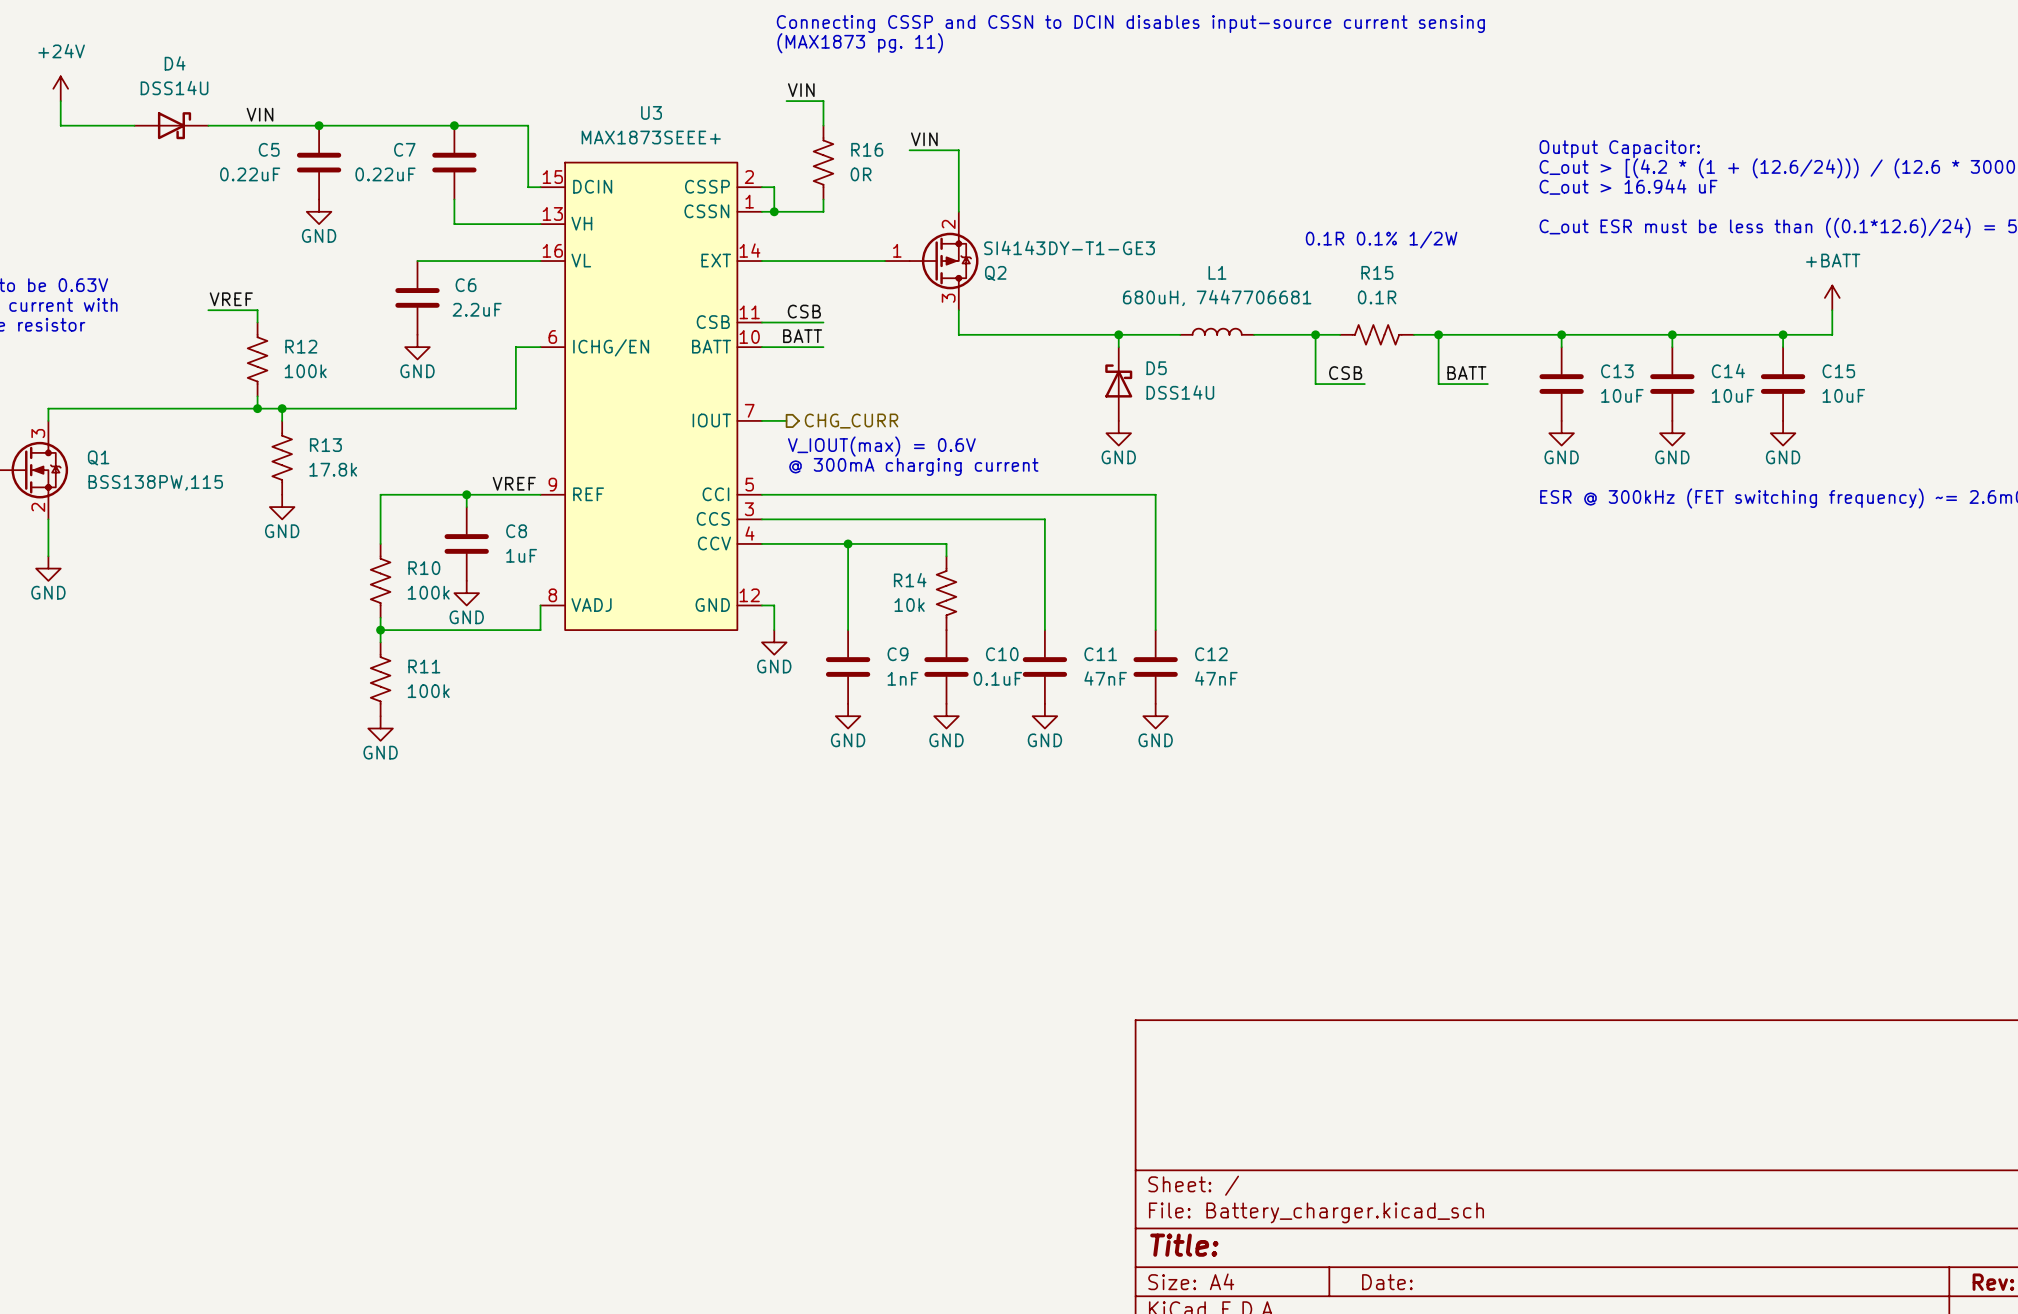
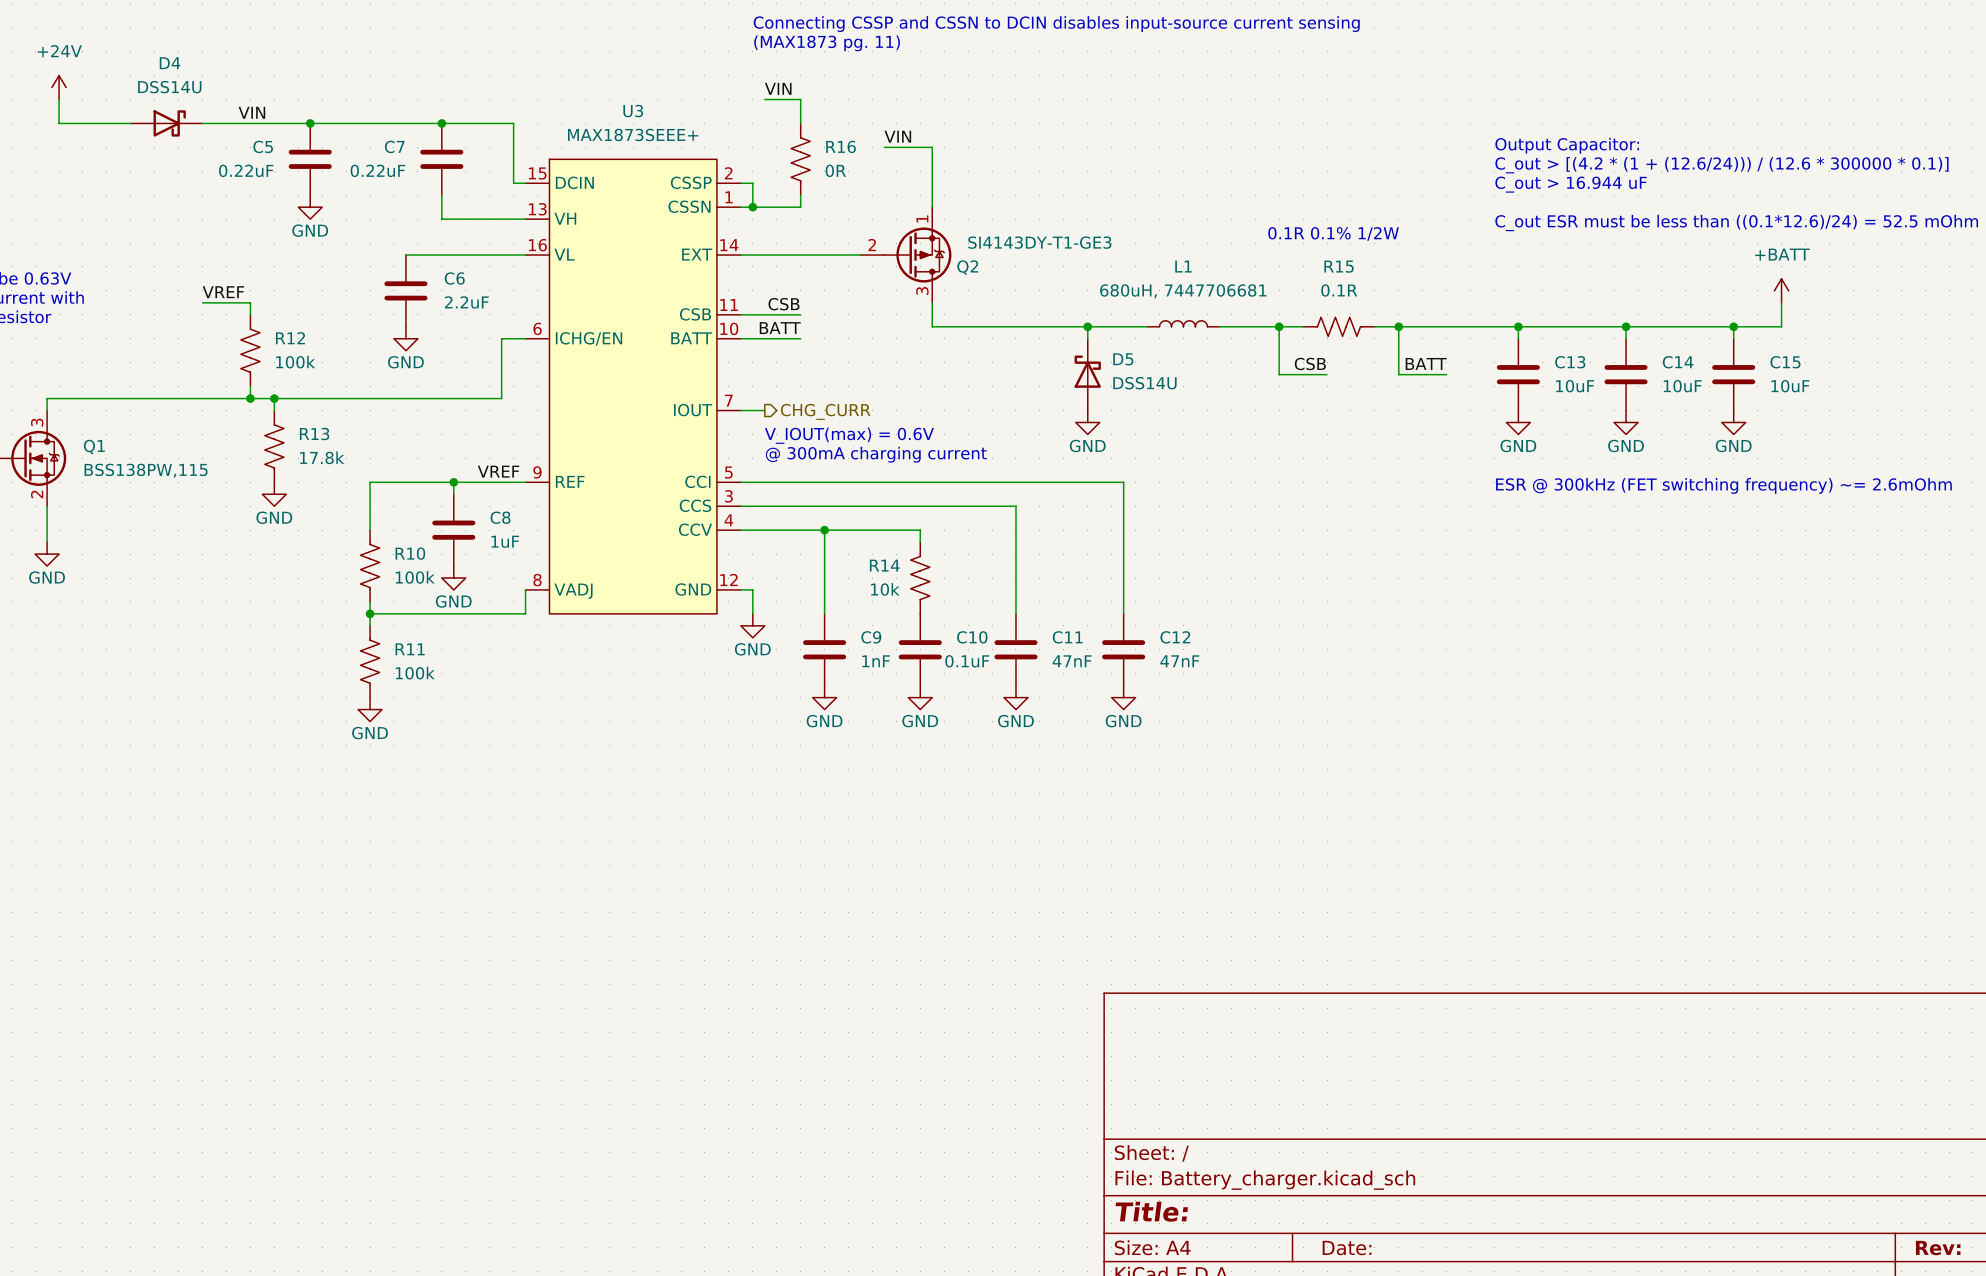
Q2 pin number: 2 (948, 224) -> 1 (922, 219)
Q2 pin number: 1 (897, 250) -> 2 (872, 245)

